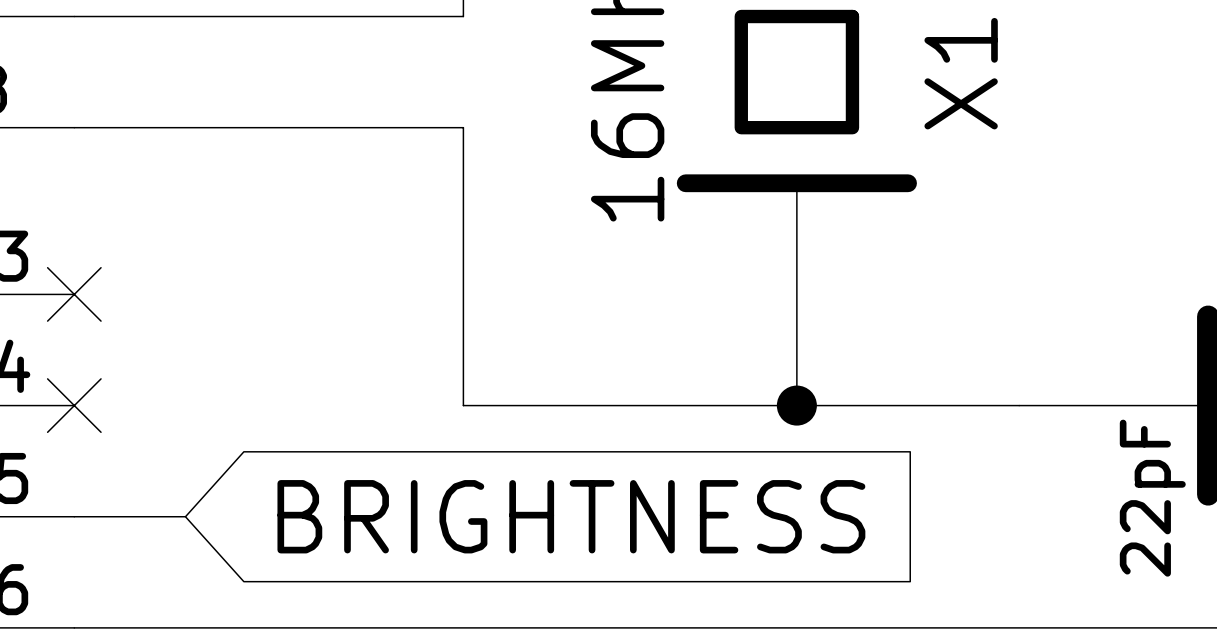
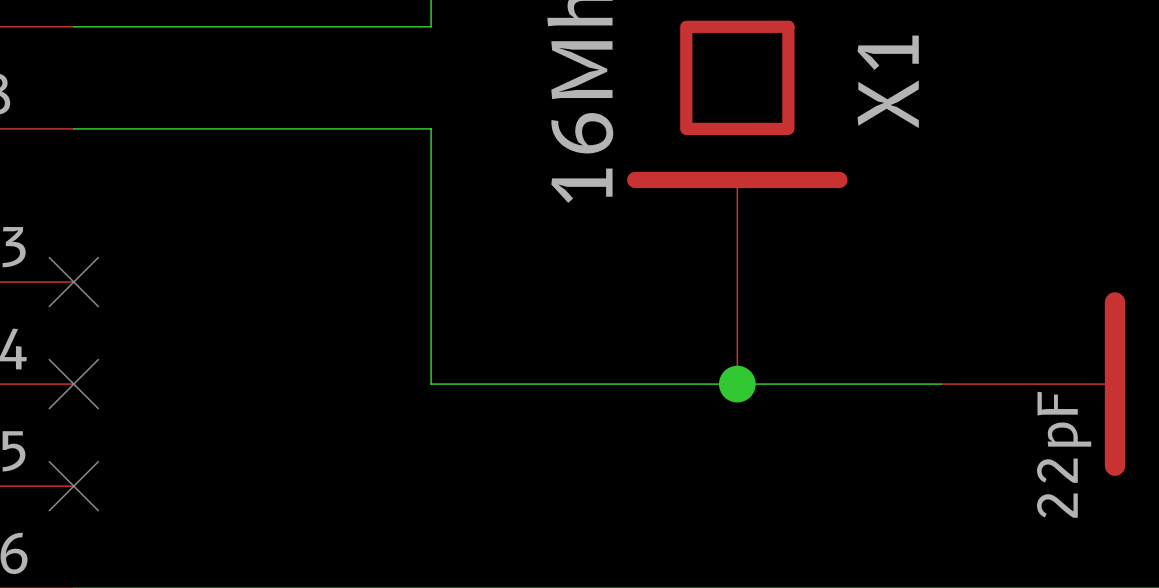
wire: (74, 516) (185, 516) -> none
no-connect mark: none -> (73, 486)
global label: BRIGHTNESS (571, 516) -> none

